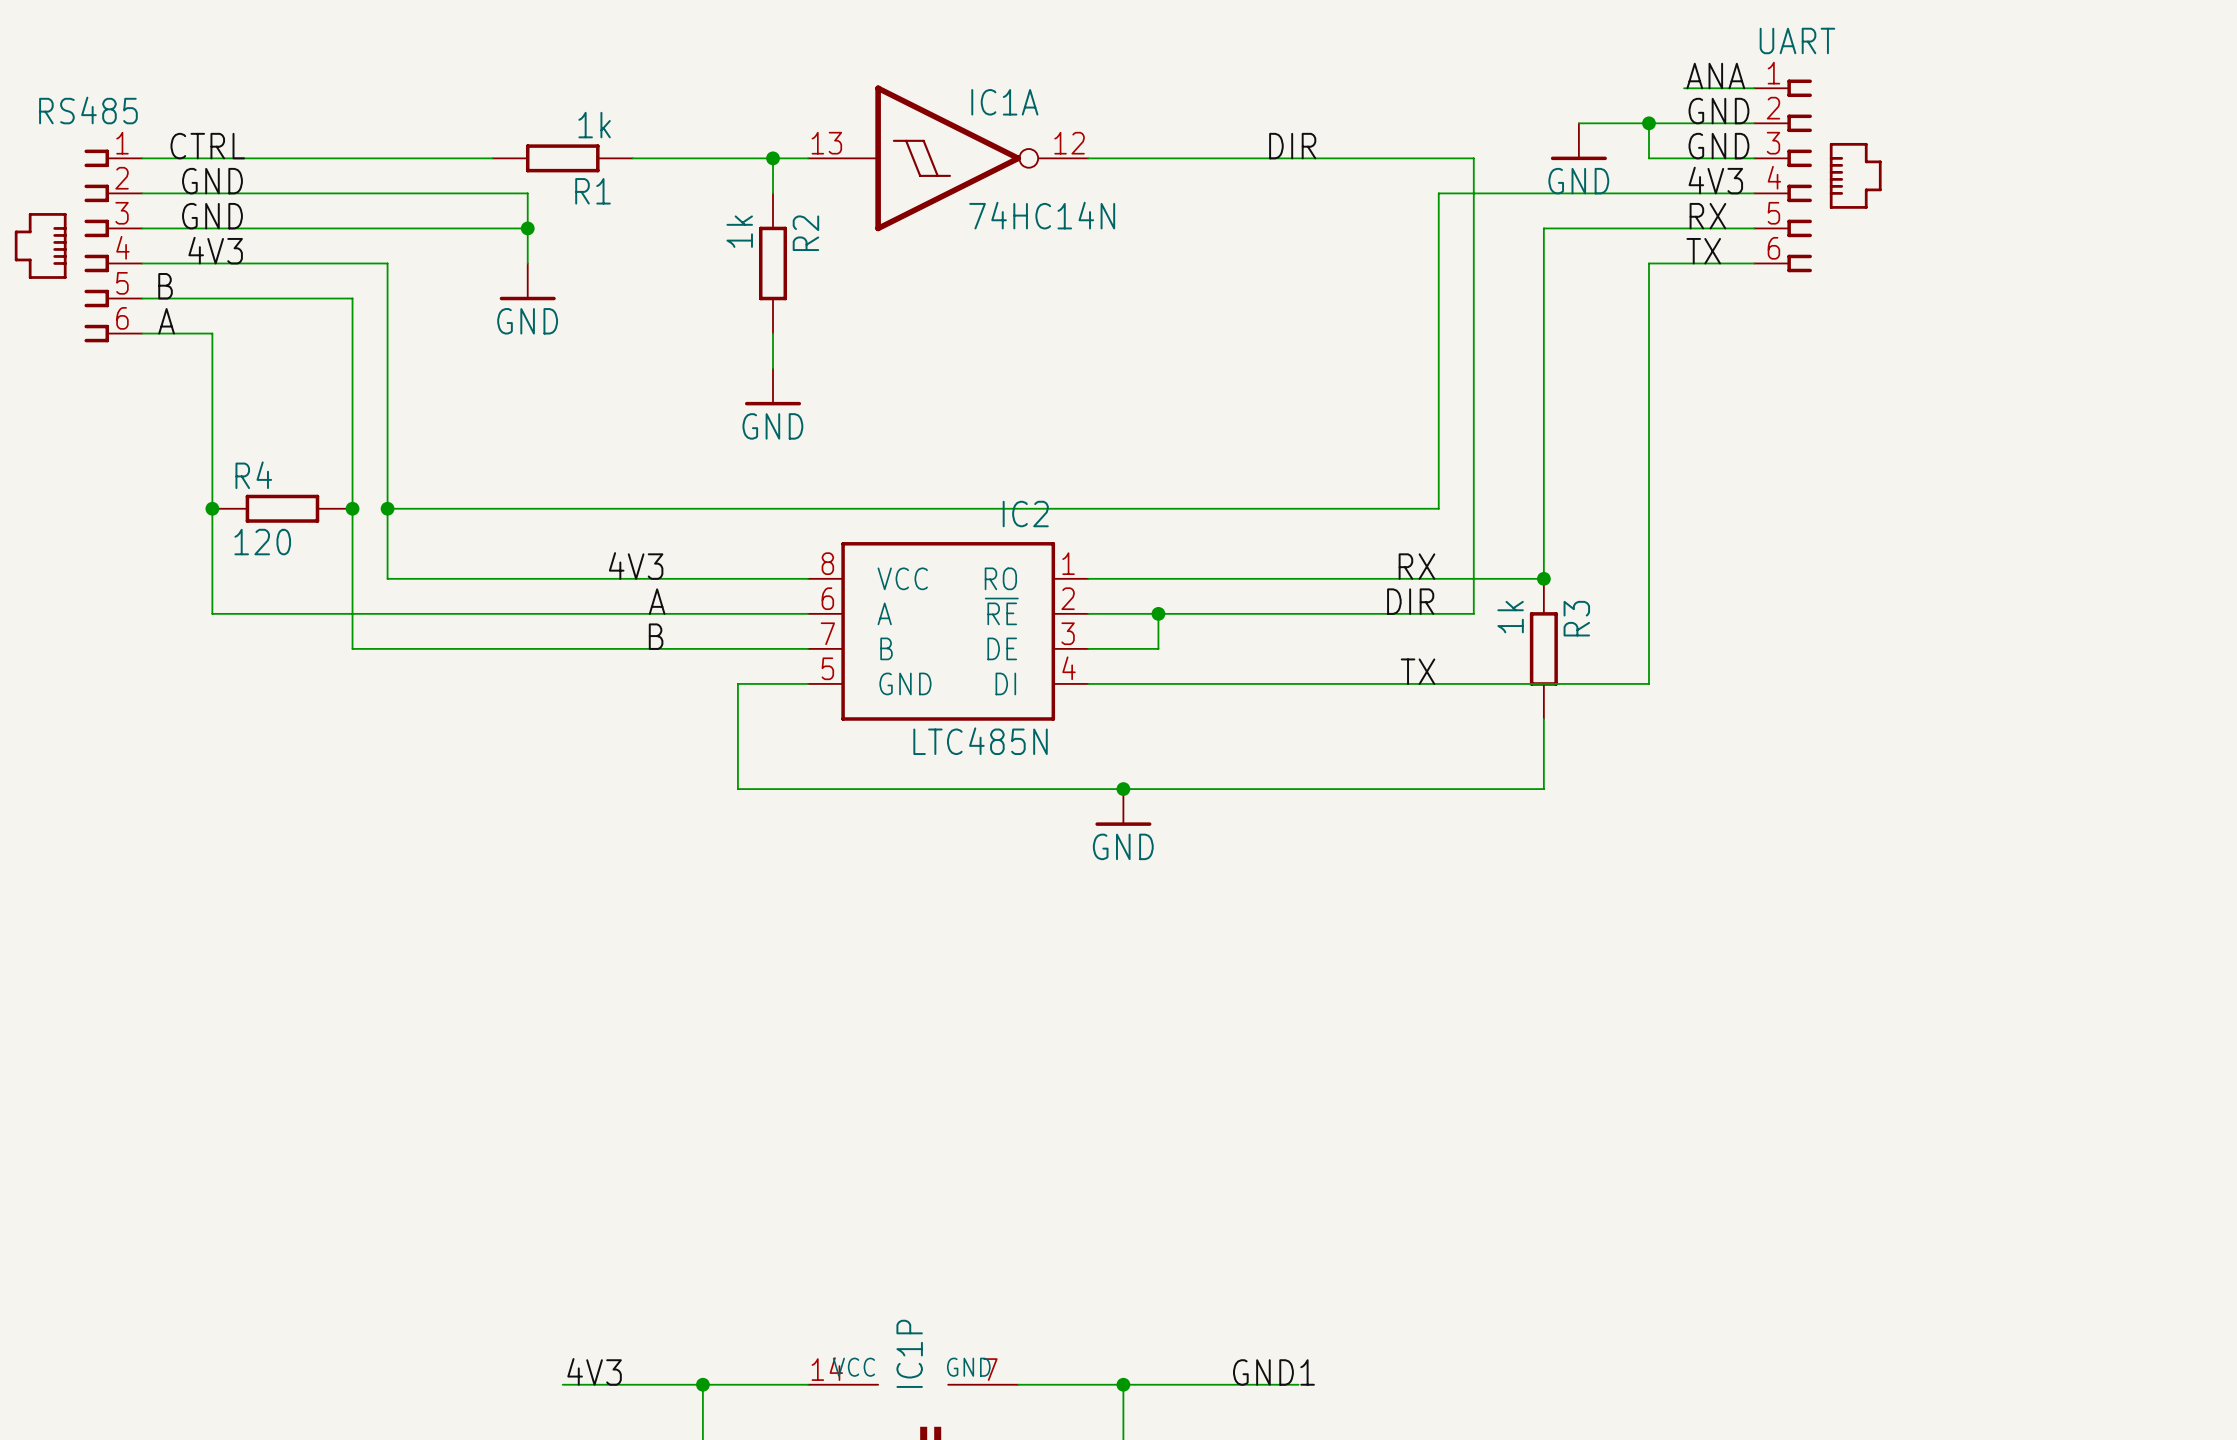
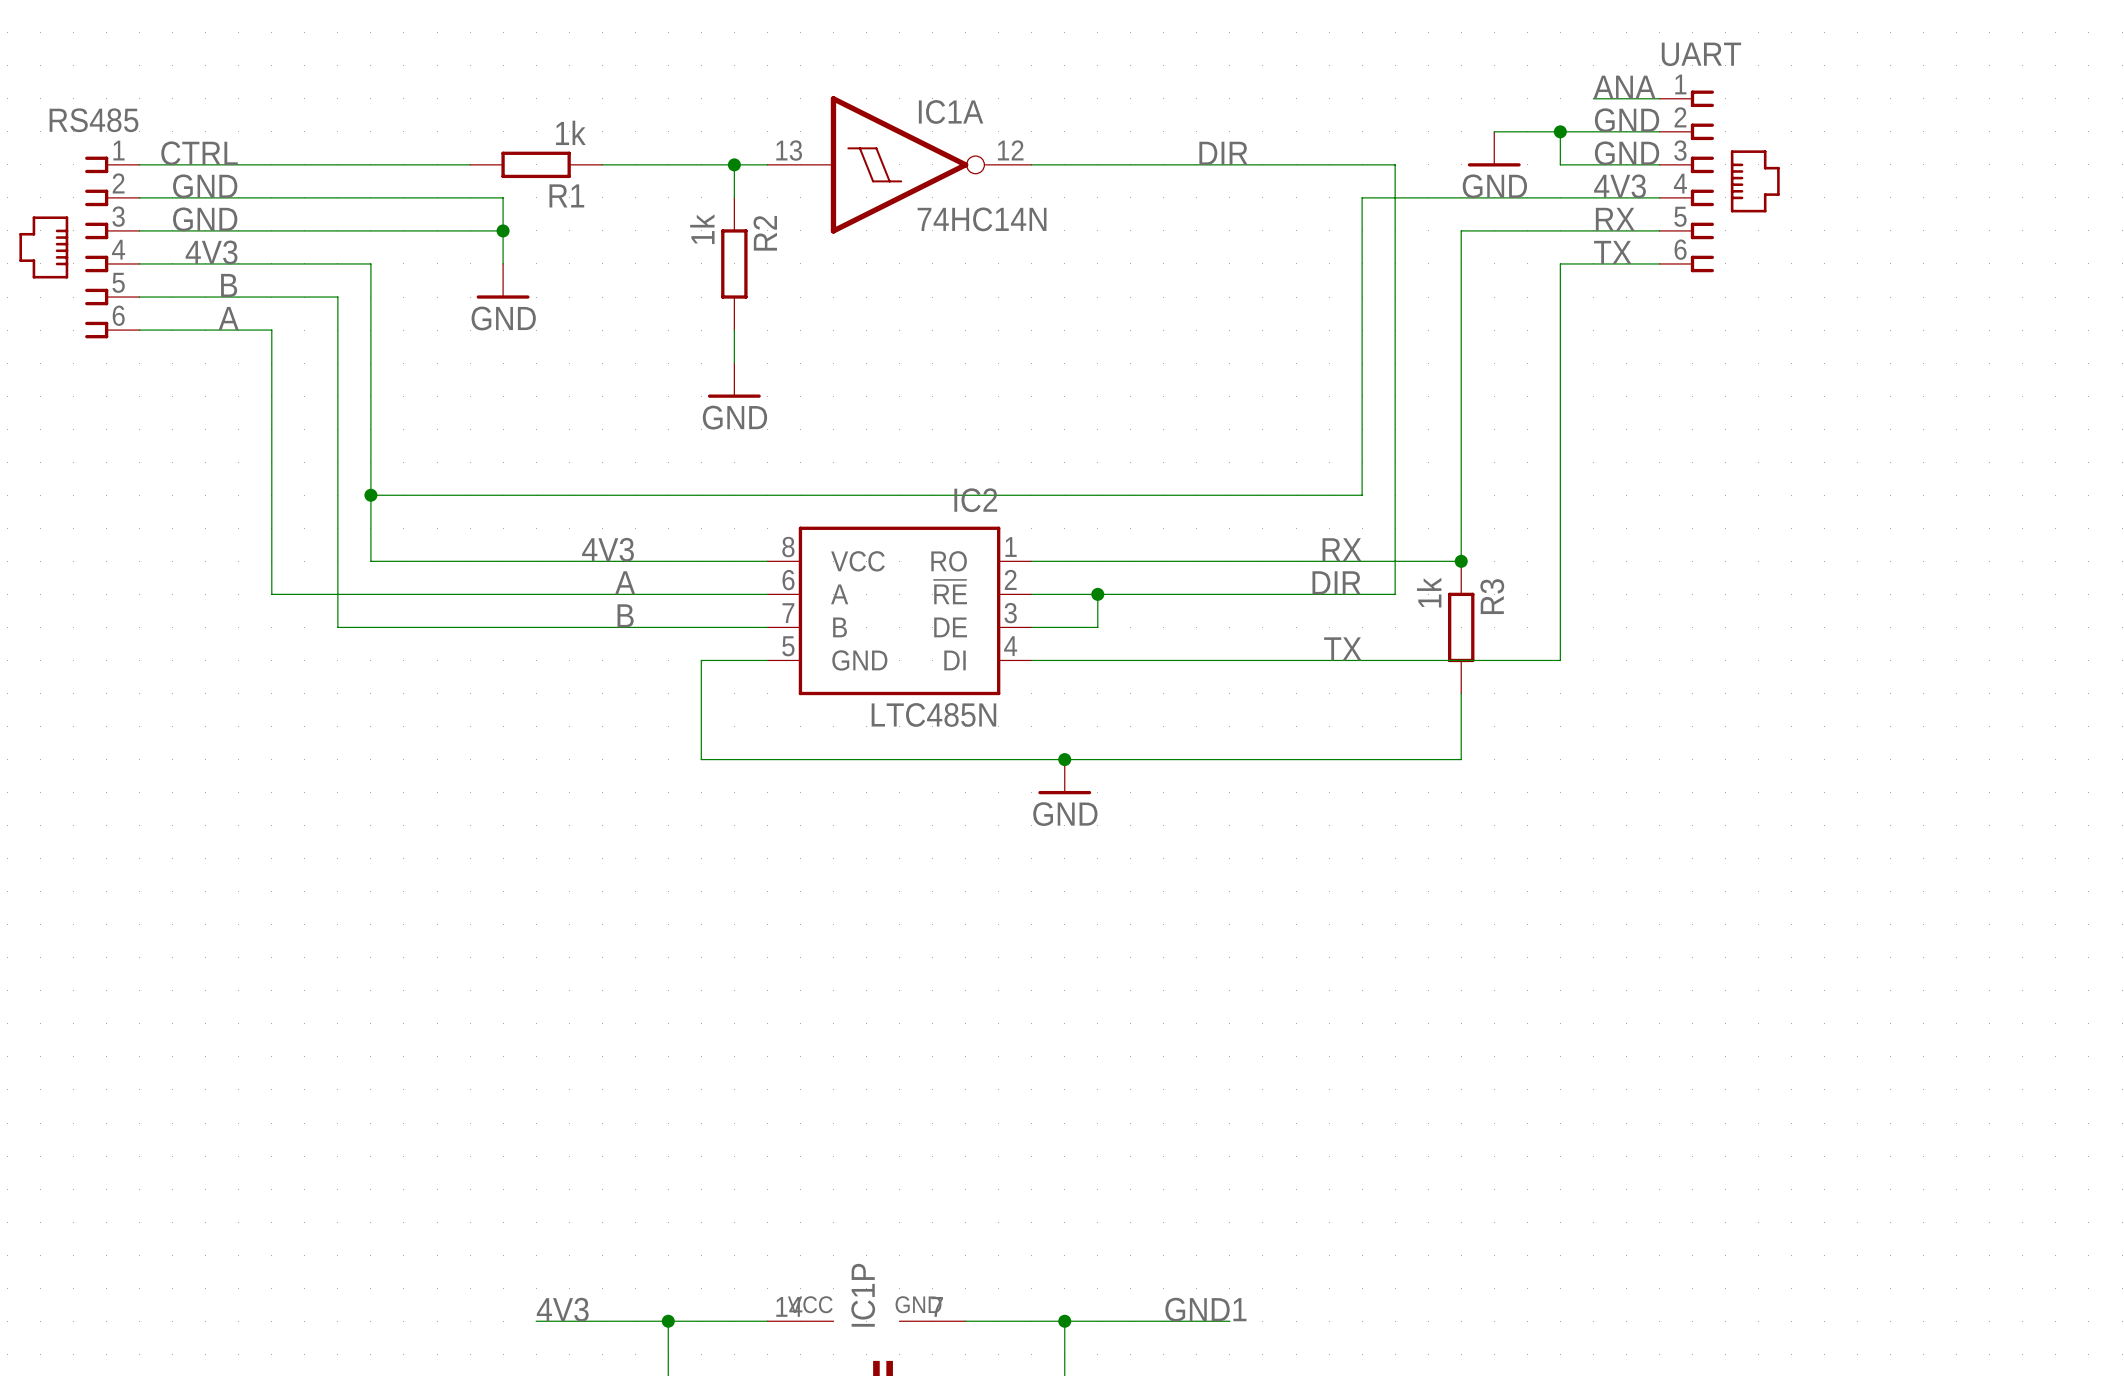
label position: B (165, 286) -> B (229, 285)
label position: A (166, 321) -> A (228, 318)
wire: (212, 333) (212, 613) (282, 613) -> (205, 330) (271, 330) (271, 594)
junction: (212, 508) -> none
R4: 120 (282, 508) -> none
junction: (352, 508) -> none

